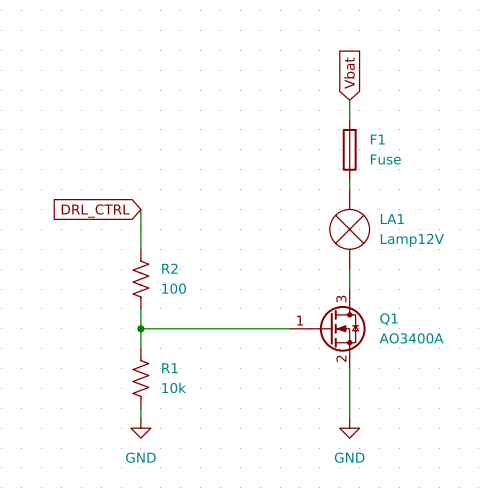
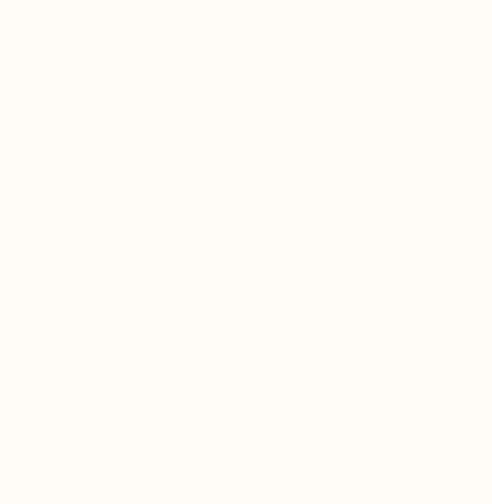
global label: Vbat (349, 73) -> none
wire: (349, 100) (349, 120) -> none
F1: Fuse (349, 149) -> none
wire: (349, 179) (349, 189) -> none
wire: (140, 209) (140, 249) -> none
global label: DRL_CTRL (95, 211) -> none
LA1: Lamp12V (349, 229) -> none
wire: (349, 269) (349, 289) -> none
R2: 100 (140, 279) -> none
wire: (140, 308) (140, 348) -> none
wire: (140, 328) (290, 328) -> none
junction: (140, 328) -> none
Q1: AO3400A (327, 328) -> none
wire: (349, 368) (349, 418) -> none
R1: 10k (140, 378) -> none
wire: (140, 408) (140, 418) -> none
power symbol: GND (140, 428) -> none
power symbol: GND (349, 428) -> none

